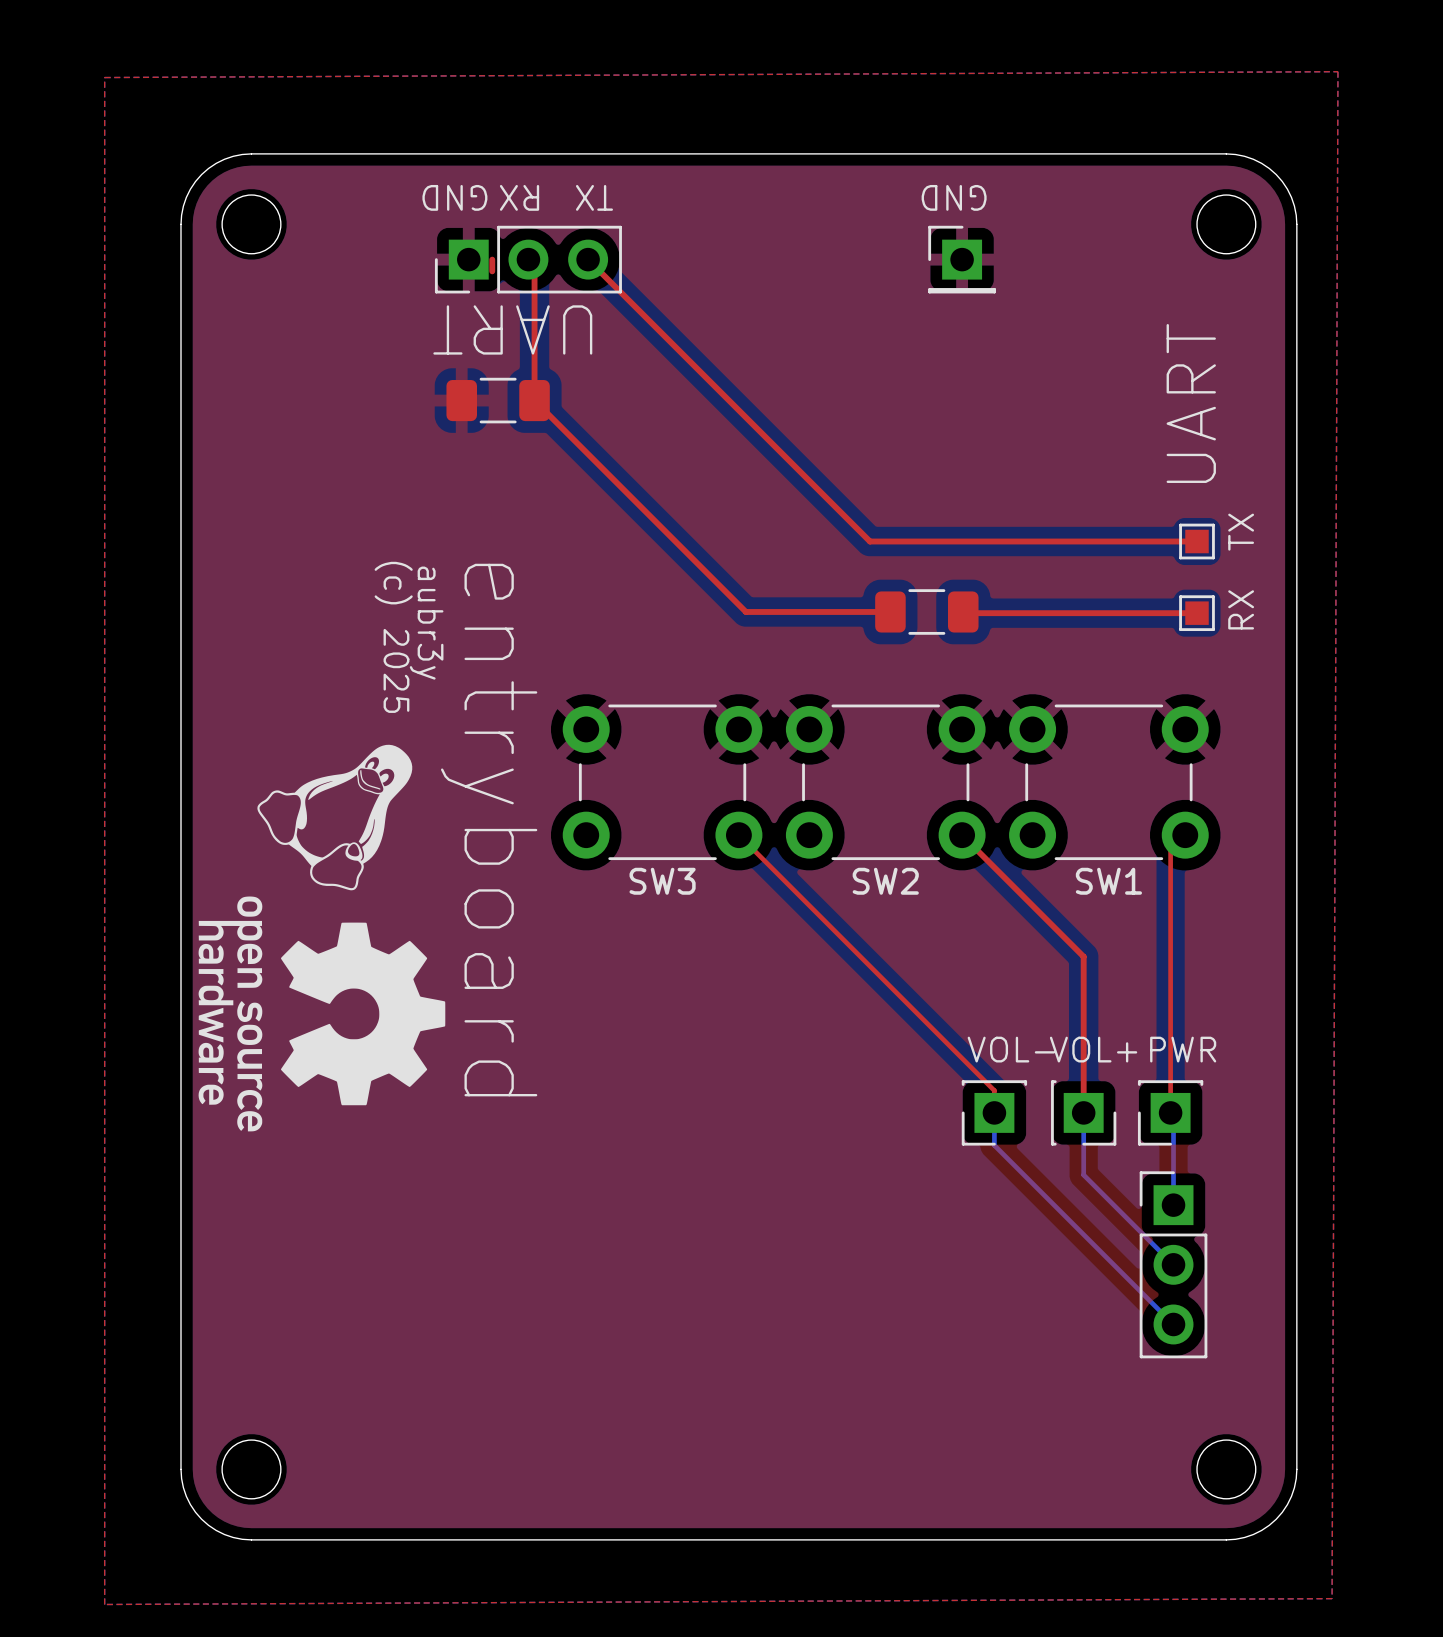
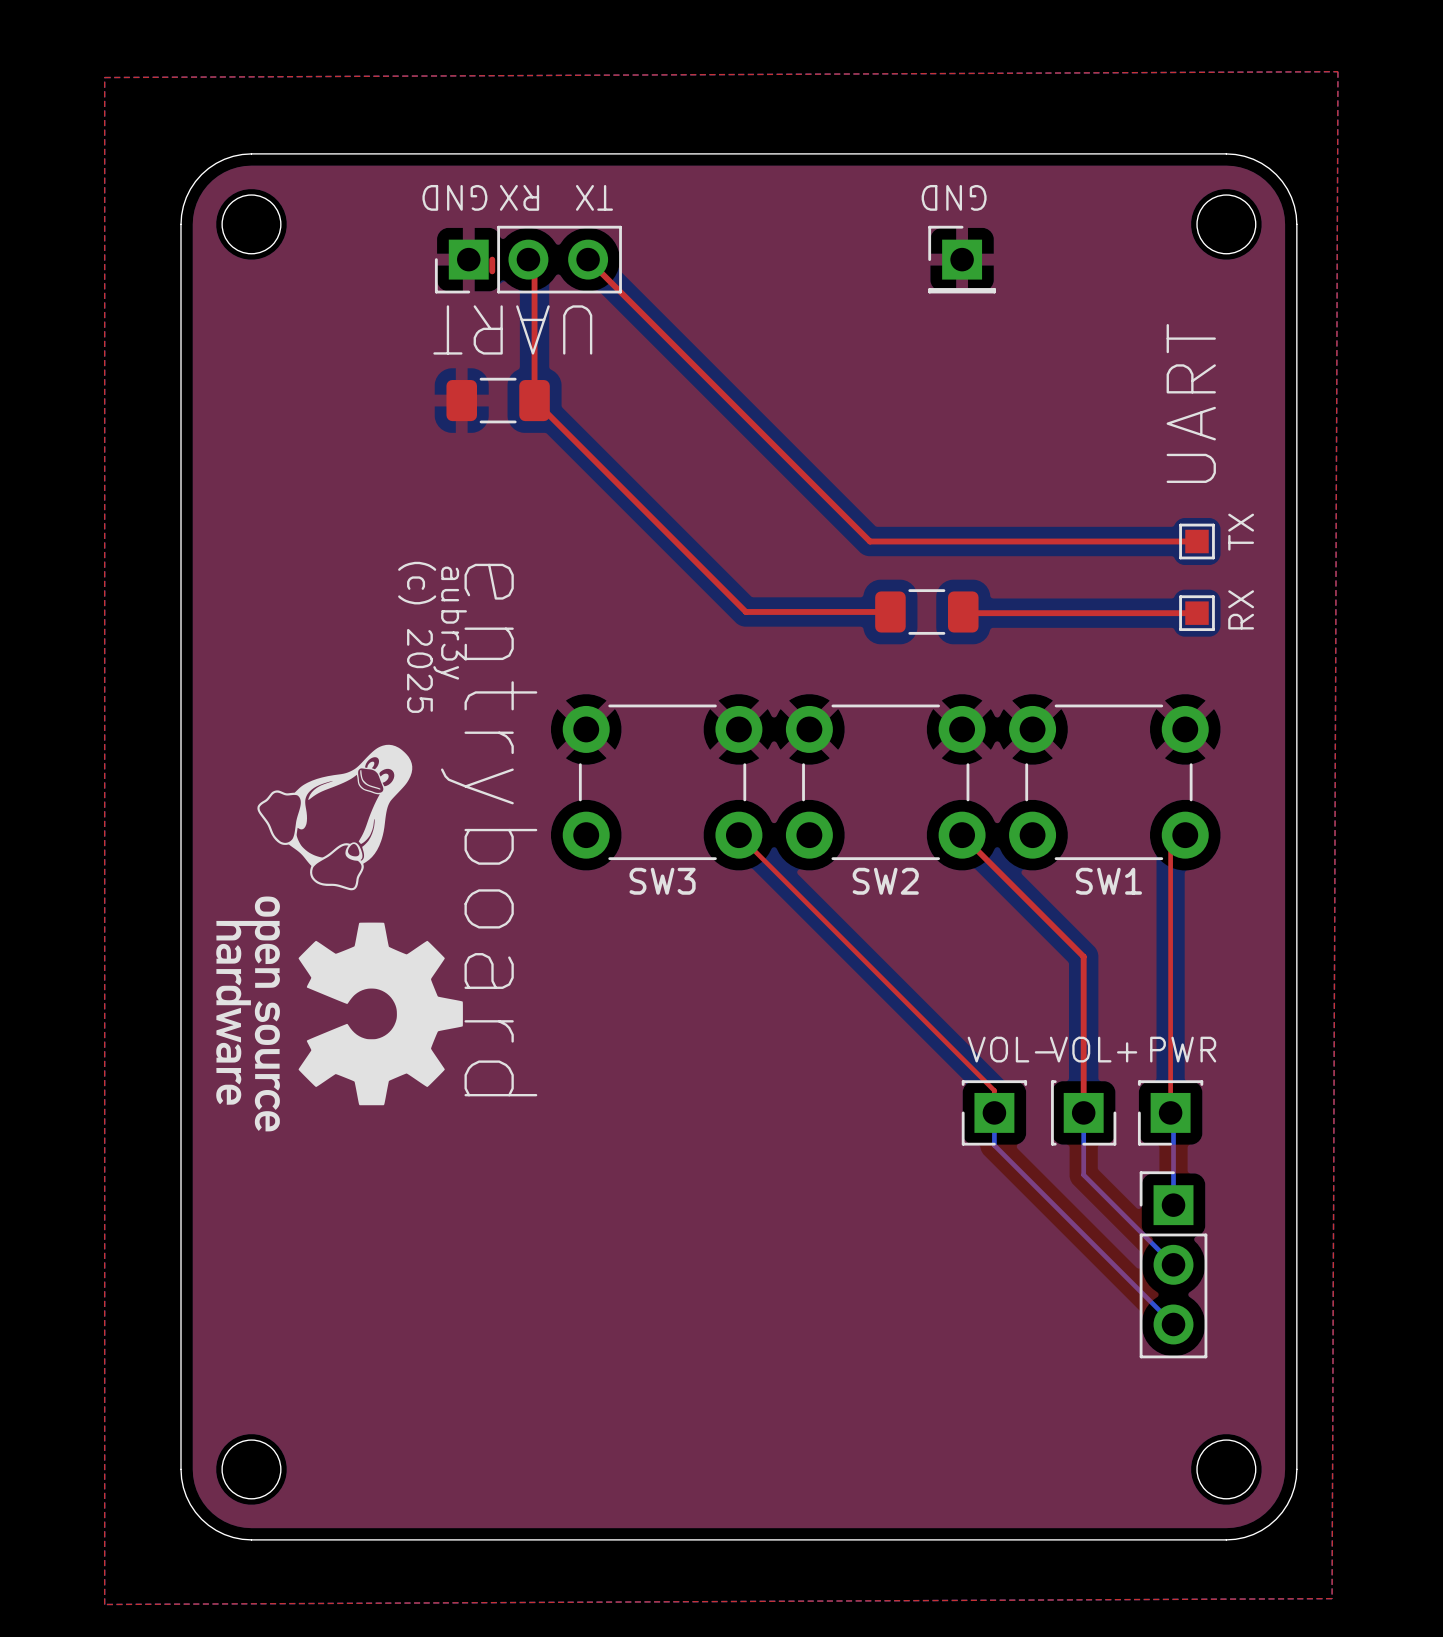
text position: aubr3y (426, 623) -> aubr3y (450, 623)
text position: (c) 2025 (393, 637) -> (c) 2025 (417, 637)
drawing position: (321, 1013) -> (339, 1013)

